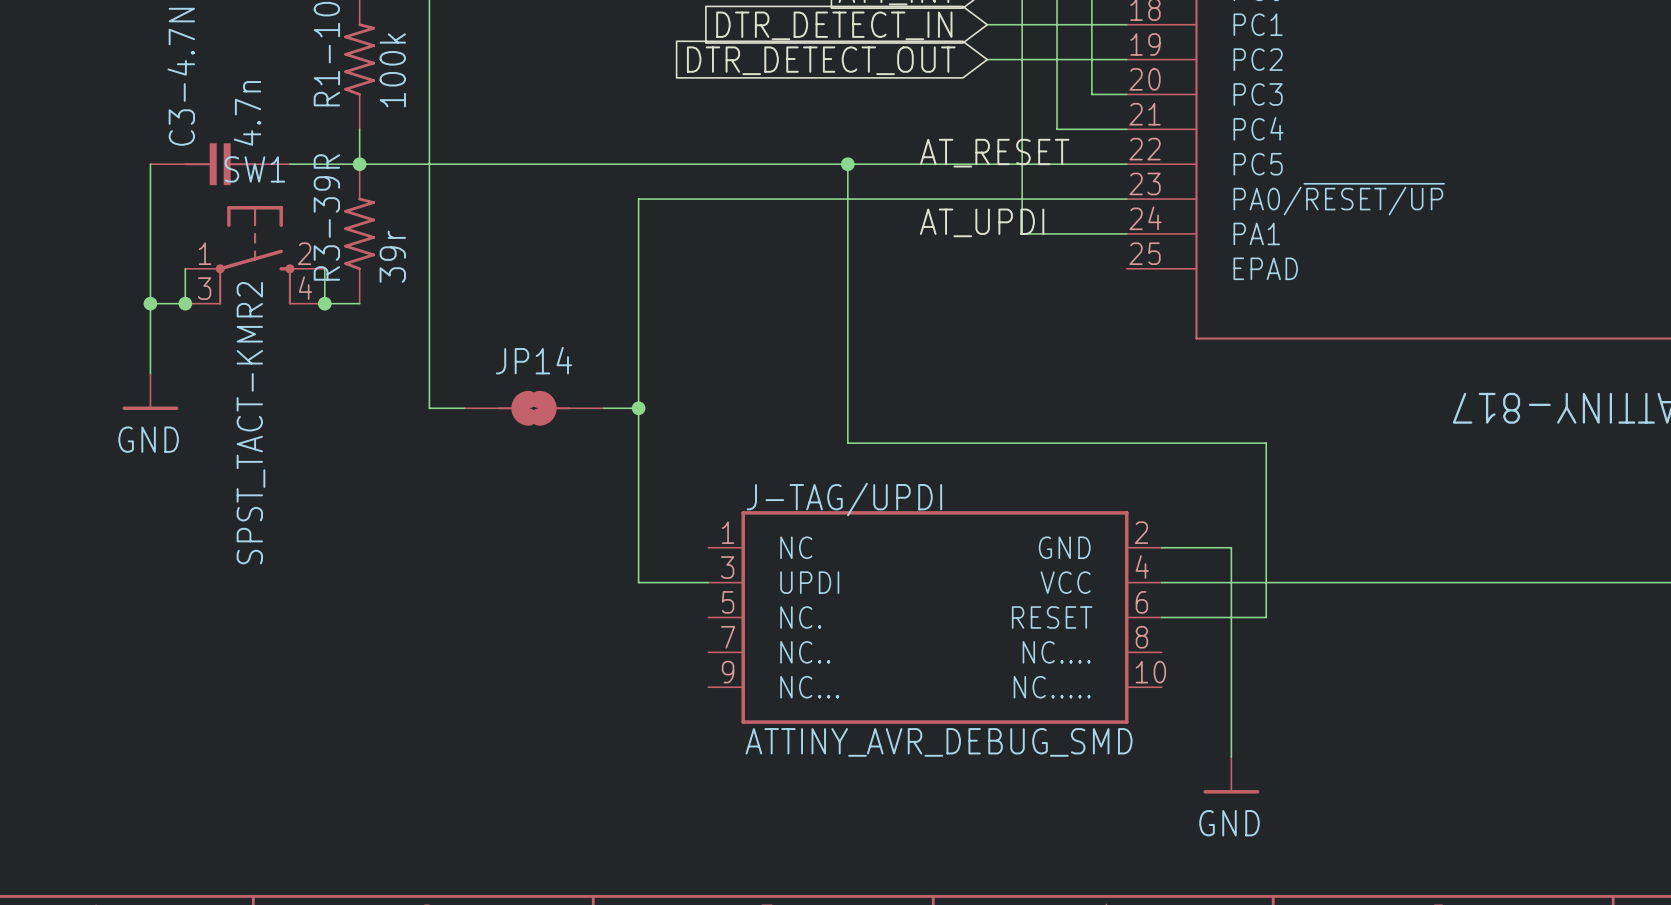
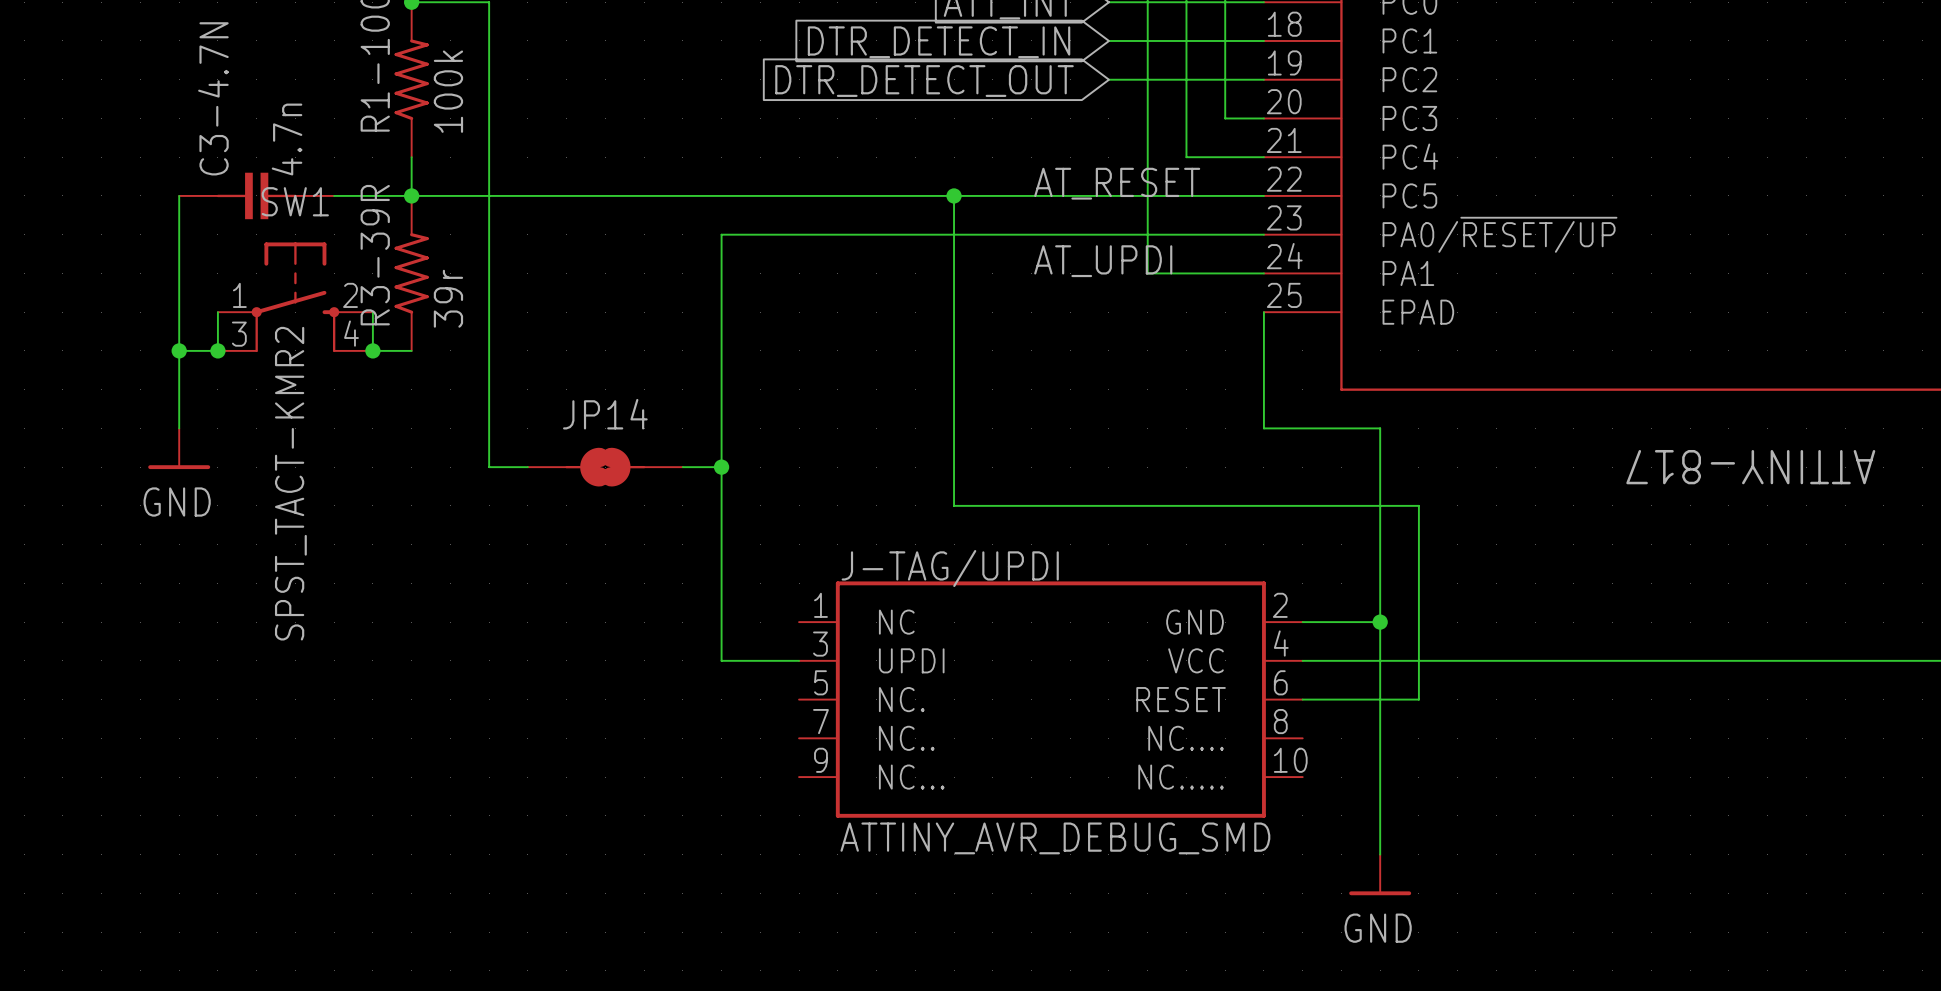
wire: none -> (1263, 312) (1263, 428) (1380, 428) (1380, 622)
junction: none -> (1380, 622)

